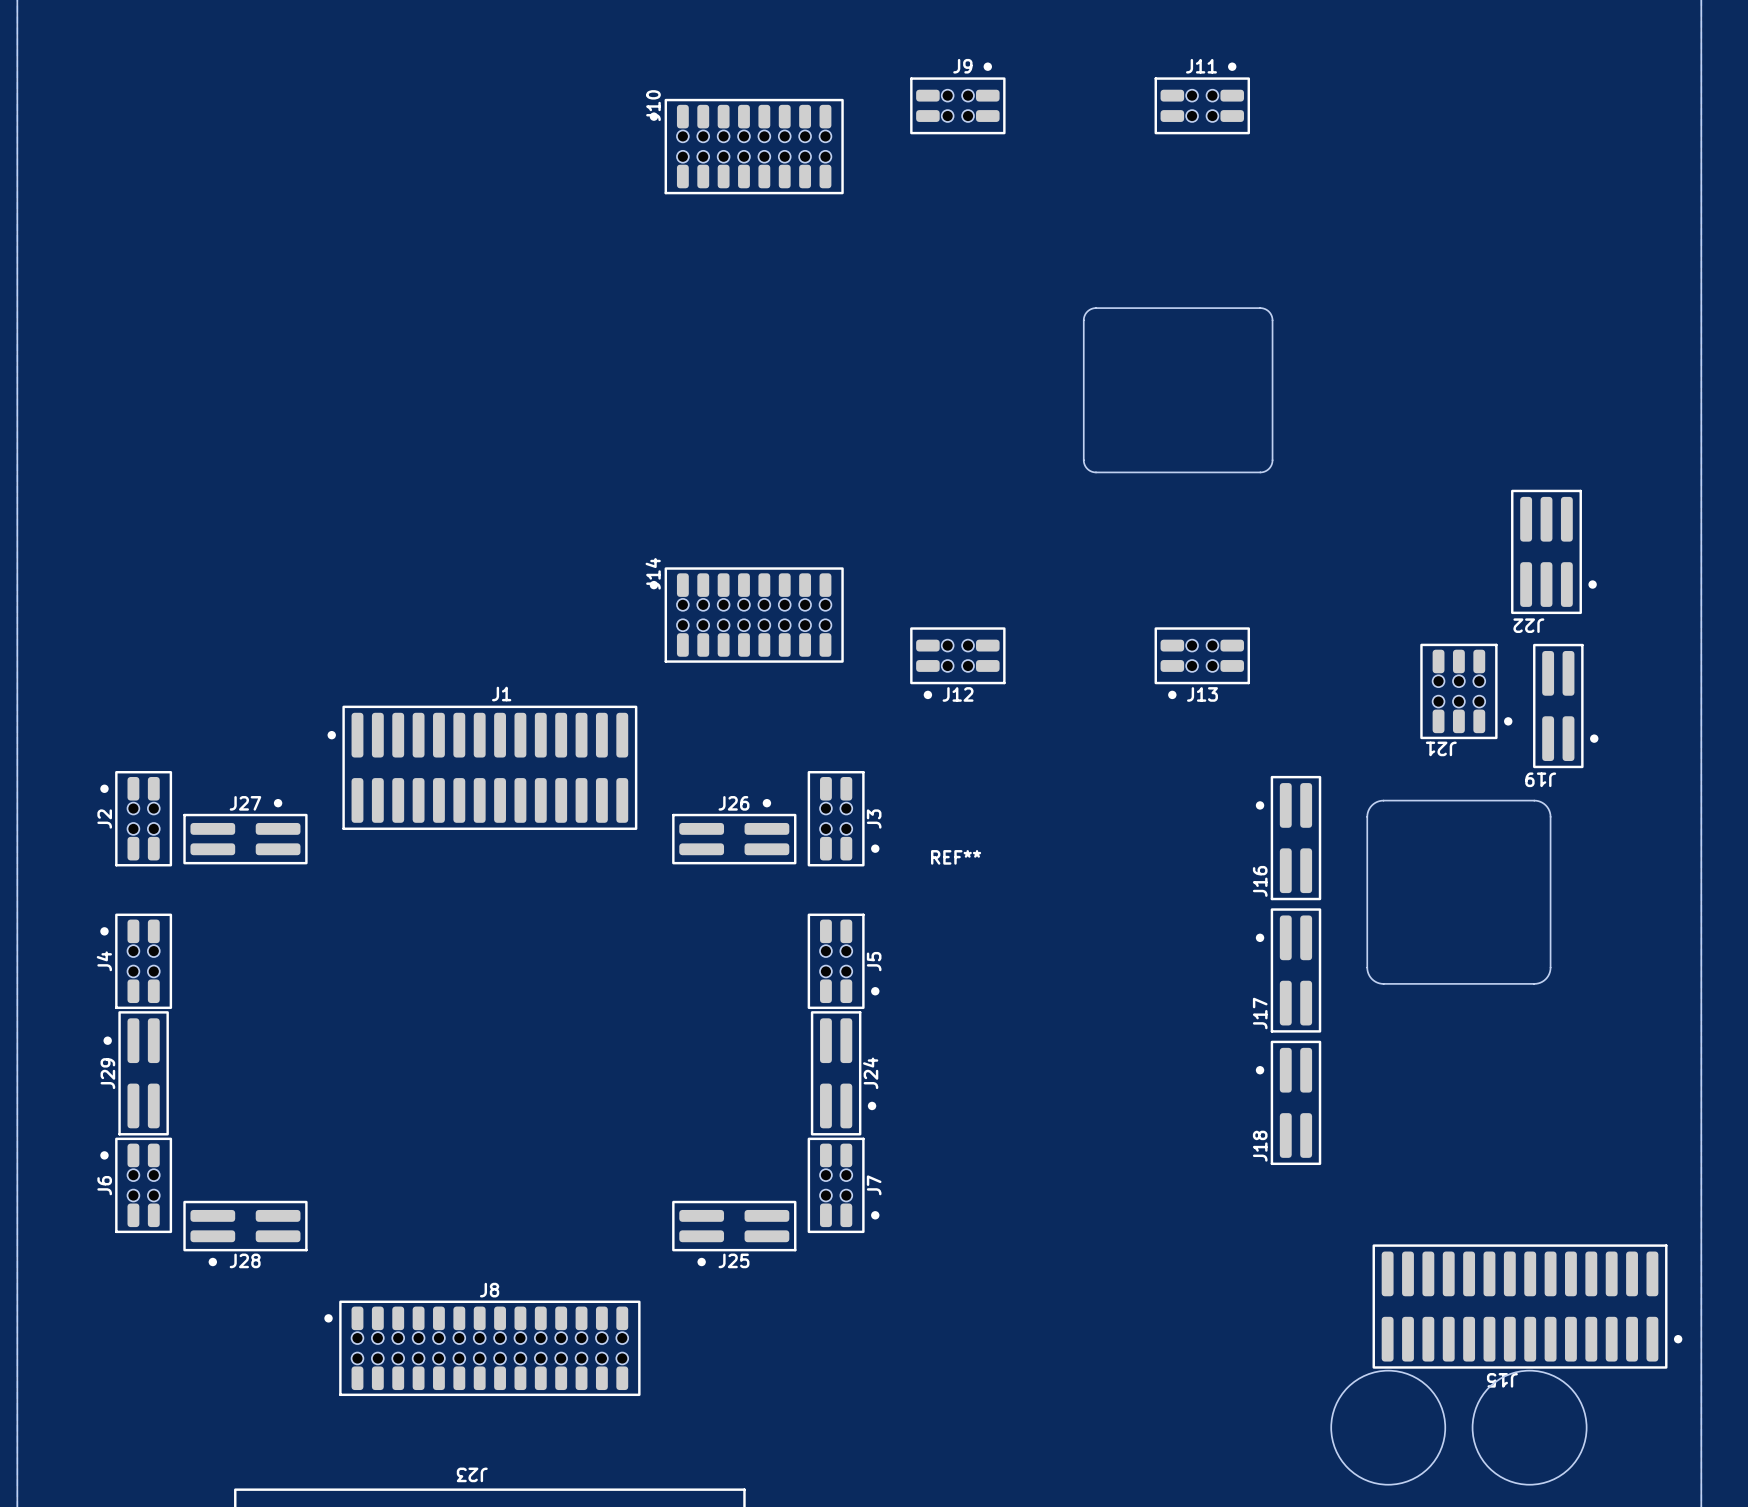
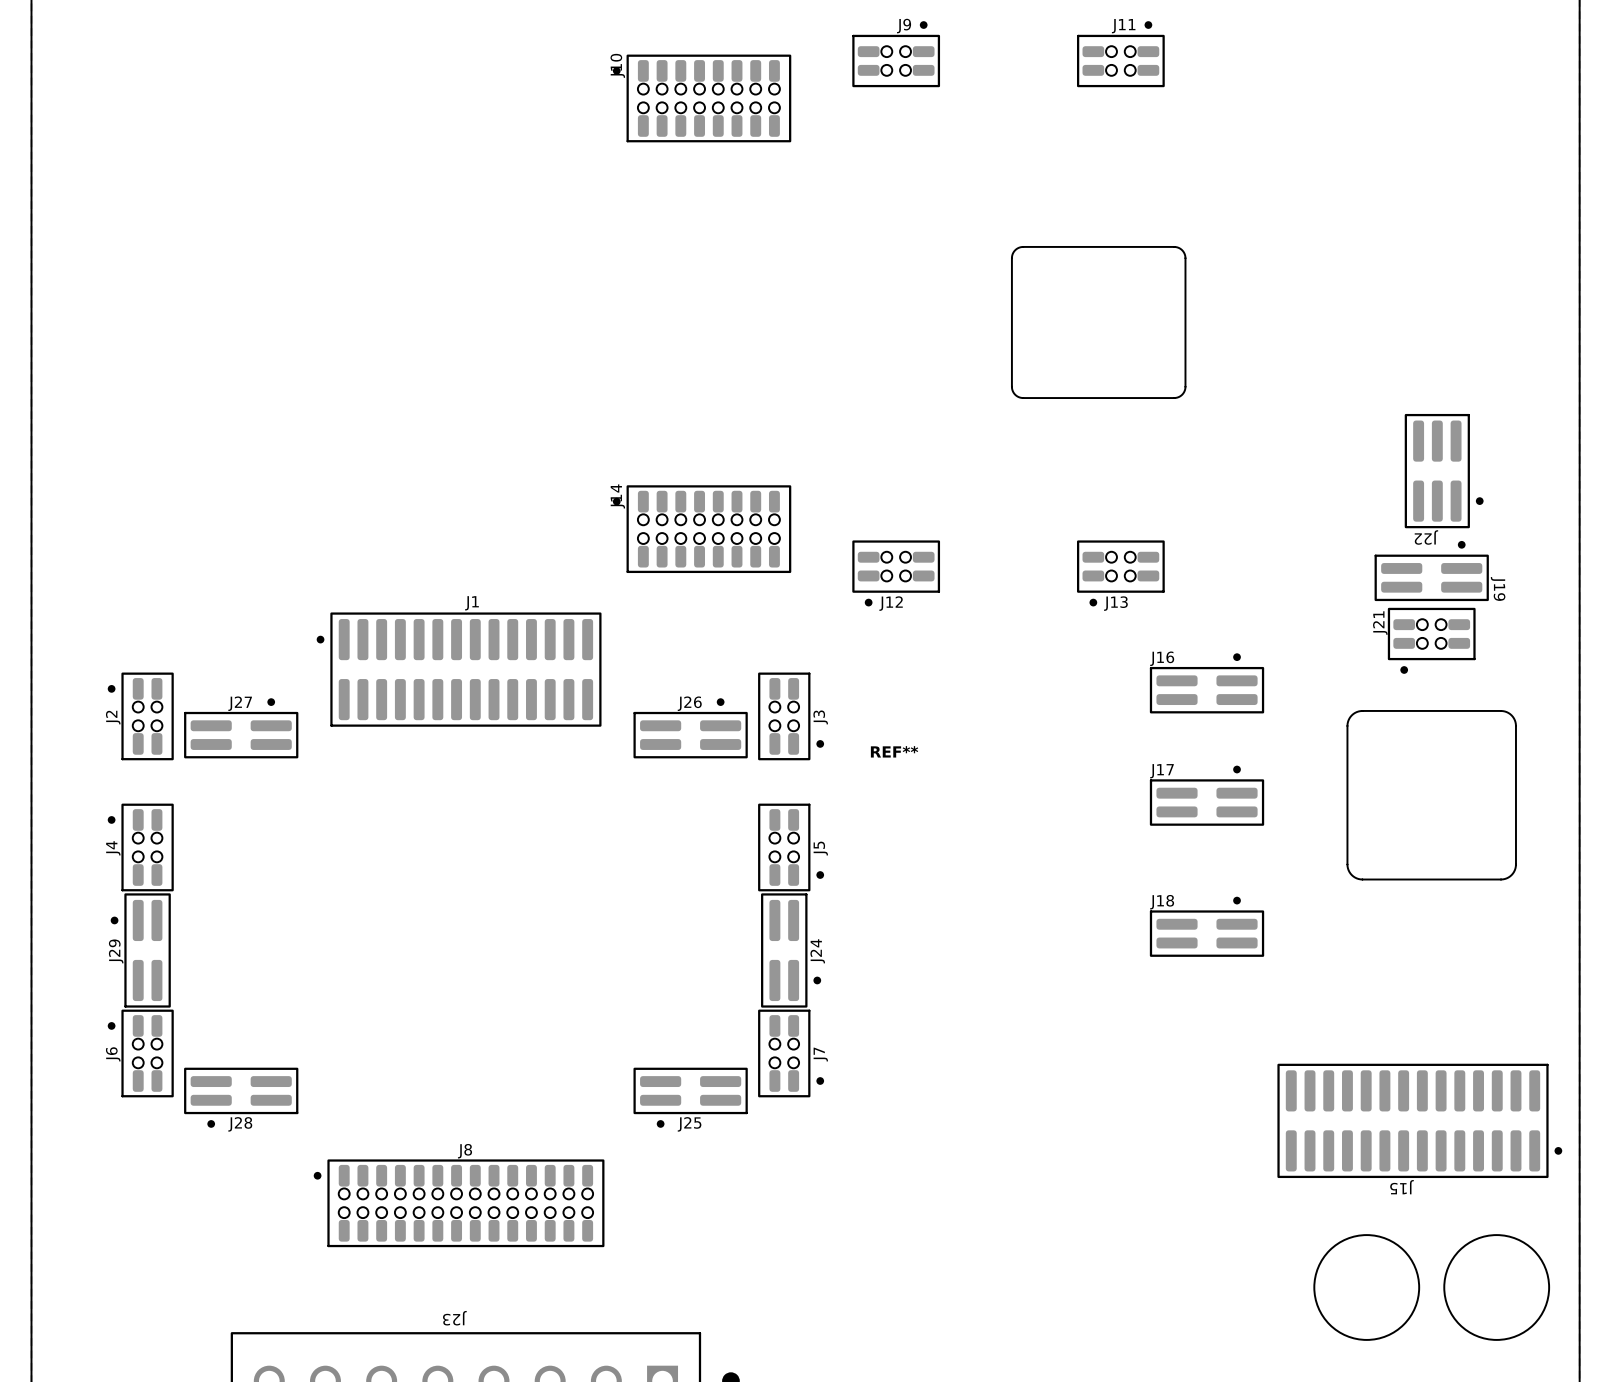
J21 footprint: [1420, 643, 1513, 740] -> [1387, 607, 1476, 674]
J19 rotation: 0° (1565, 706) -> 90° counterclockwise (1431, 571)
J21 name position: J21 (1441, 748) -> J21 (1380, 623)
J16 rotation: 0° (1288, 838) -> 90° clockwise (1207, 683)
J17 rotation: 0° (1288, 970) -> 90° clockwise (1207, 795)
J18 rotation: 0° (1288, 1102) -> 90° clockwise (1207, 926)
drawing position: (1458, 1142) -> (1431, 1025)
J15 position: (1527, 1306) -> (1419, 1120)

